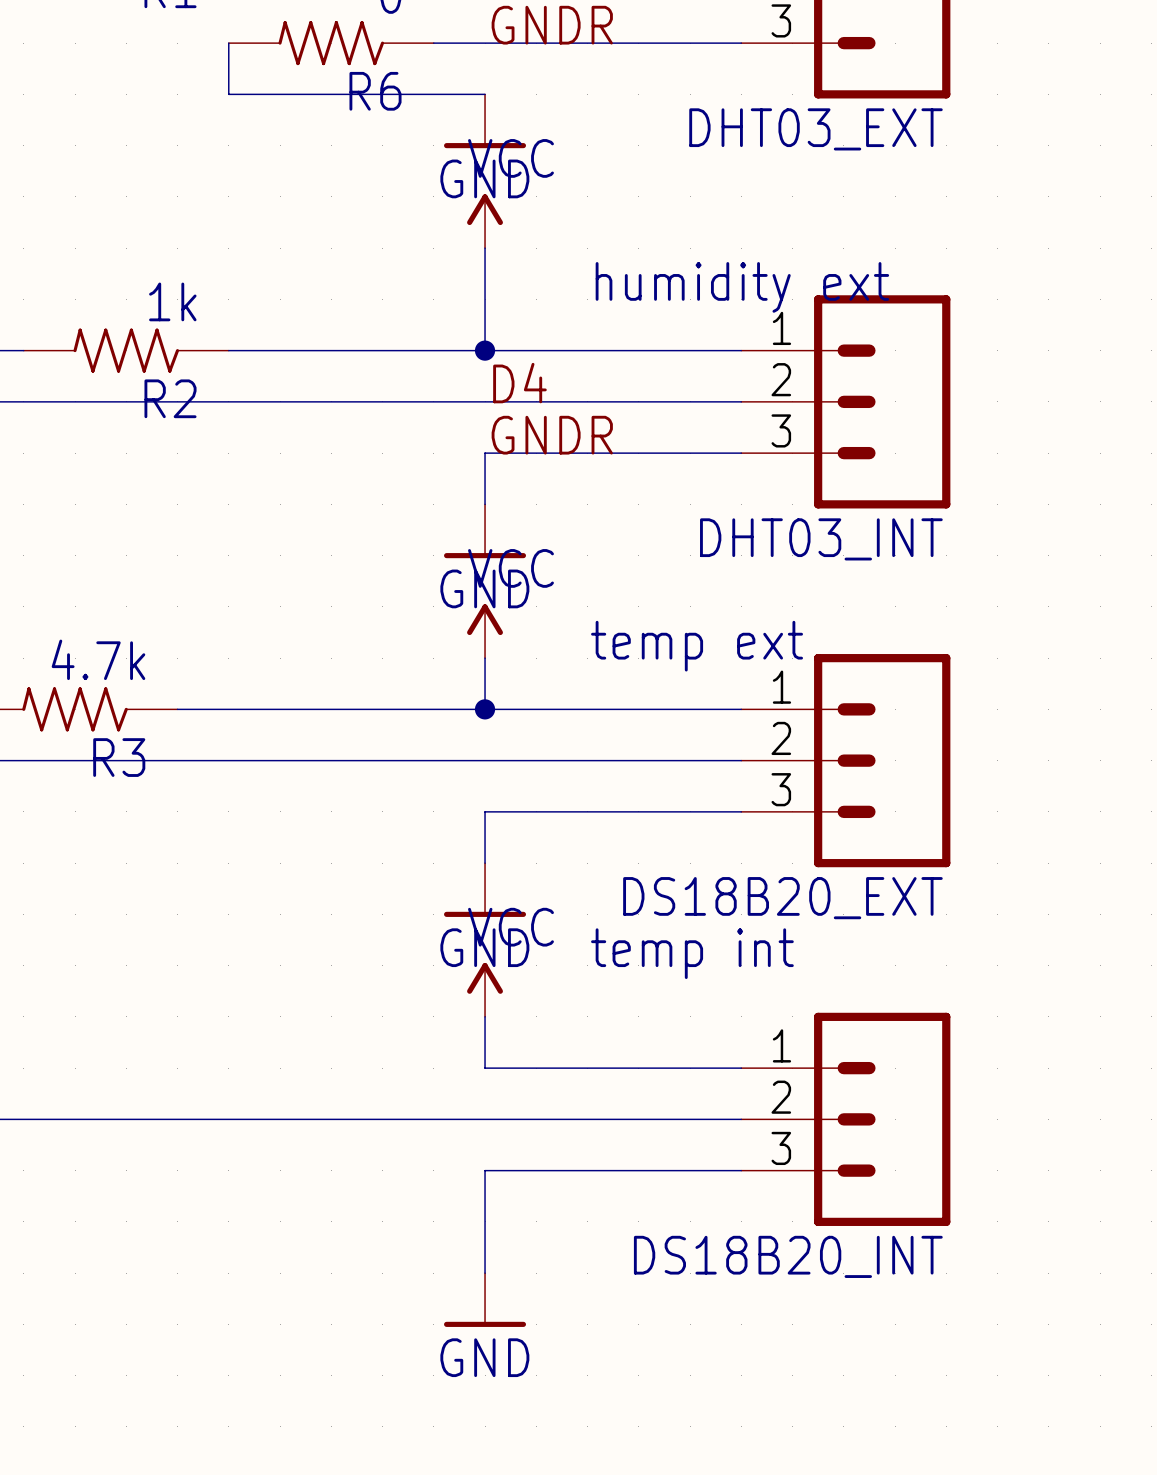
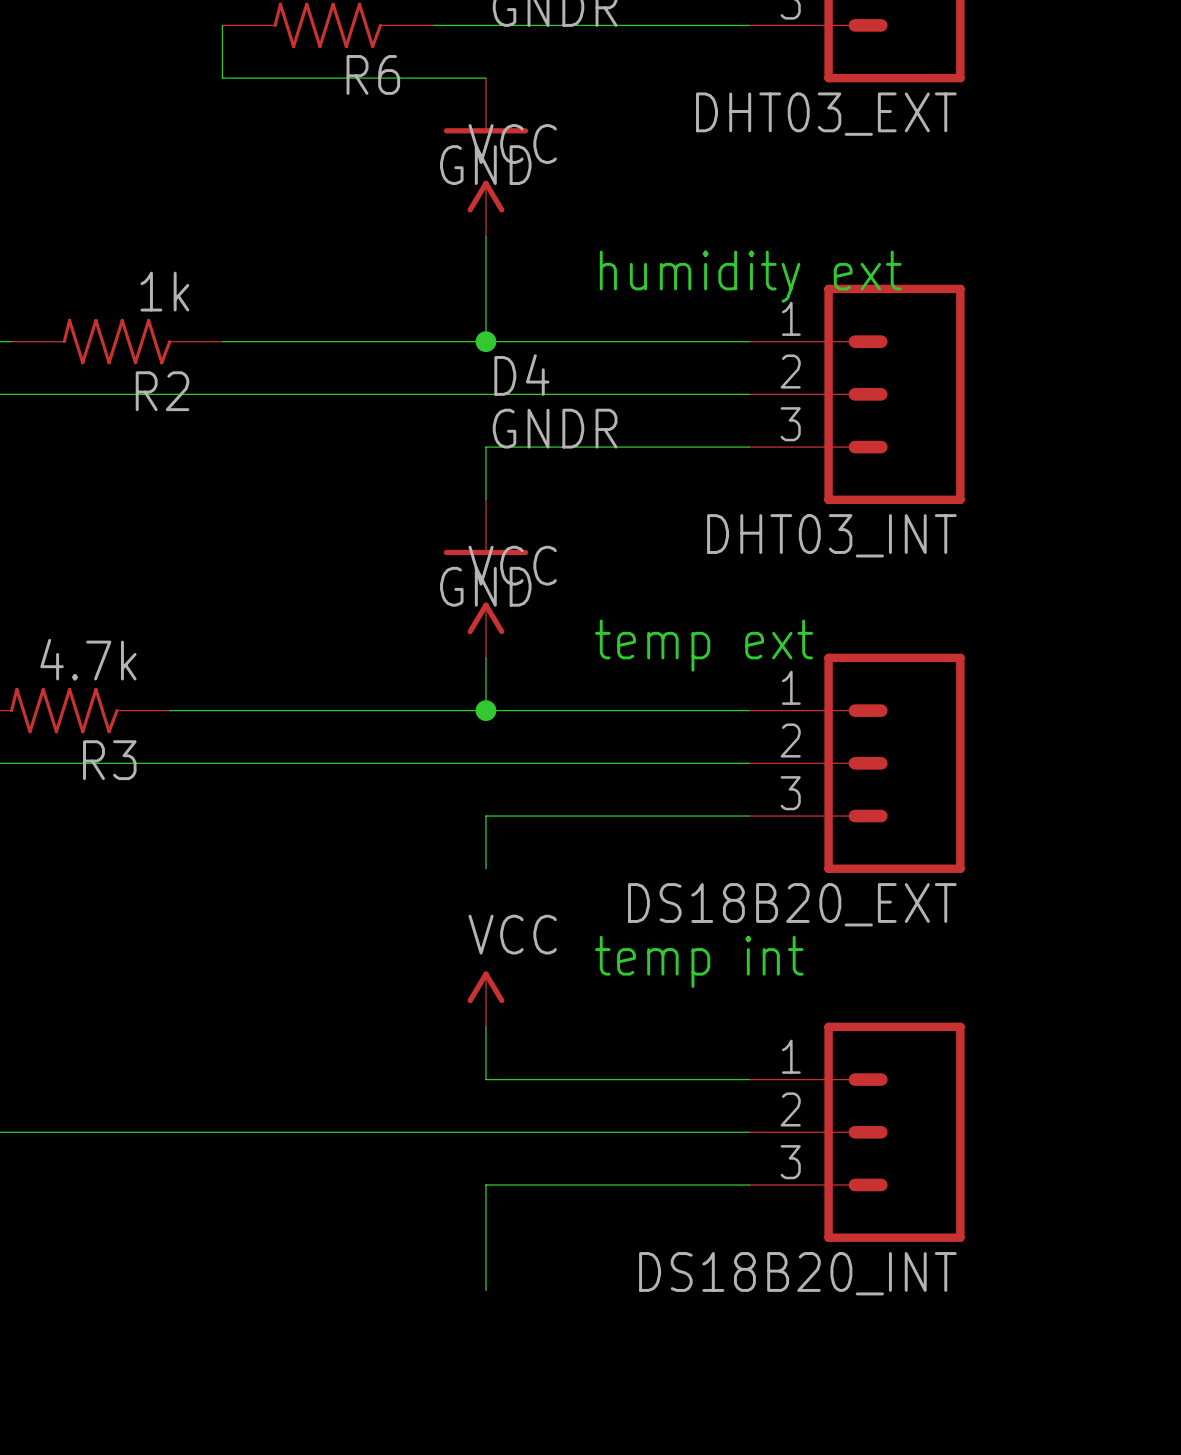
power symbol: GND (485, 890) -> none
power symbol: GND (485, 1300) -> none

